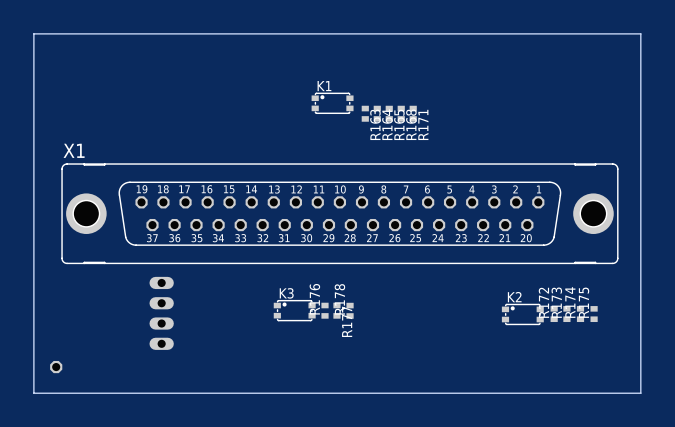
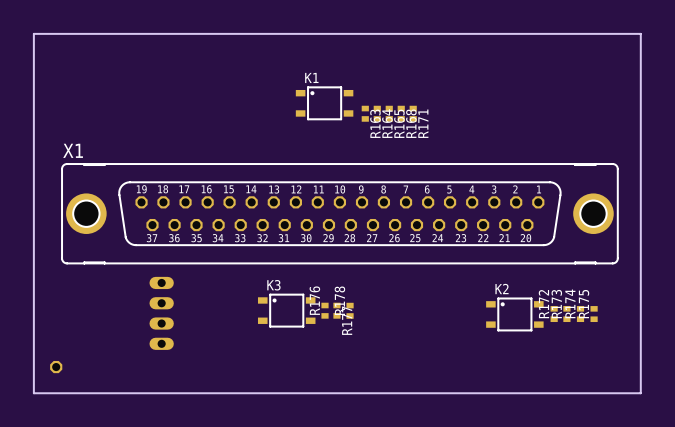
K1 footprint: [311, 92, 354, 114] -> [295, 86, 354, 121]
K3 footprint: [273, 300, 316, 322] -> [257, 293, 316, 328]
K2 footprint: [501, 303, 544, 326] -> [486, 297, 544, 332]

